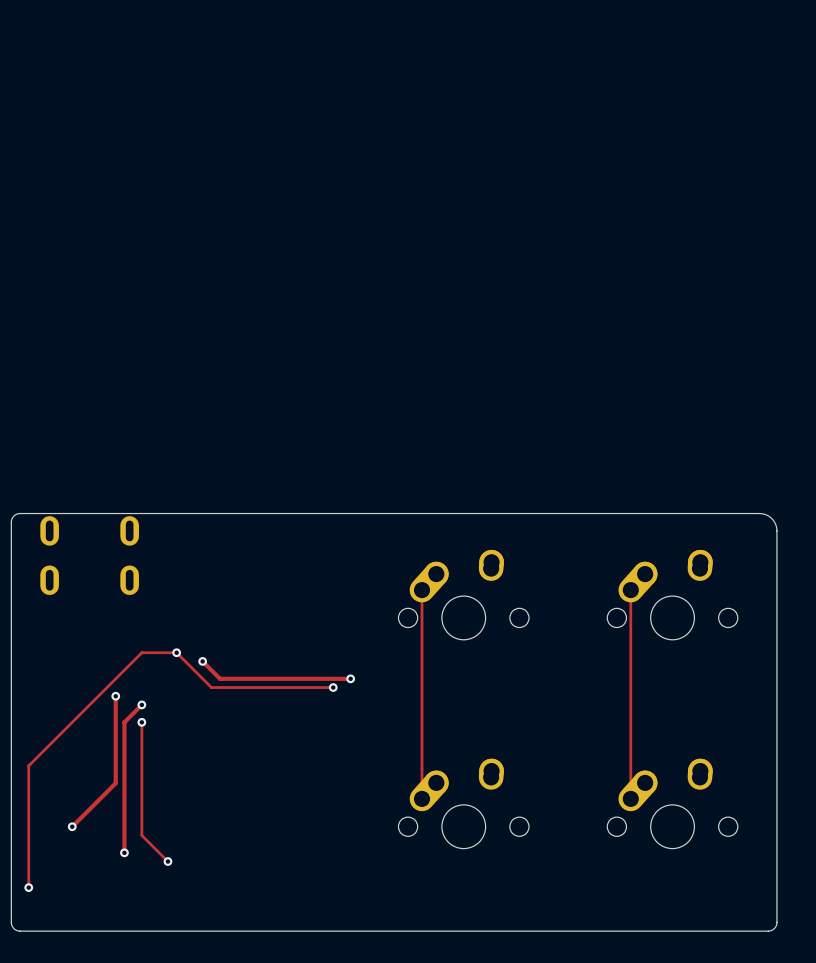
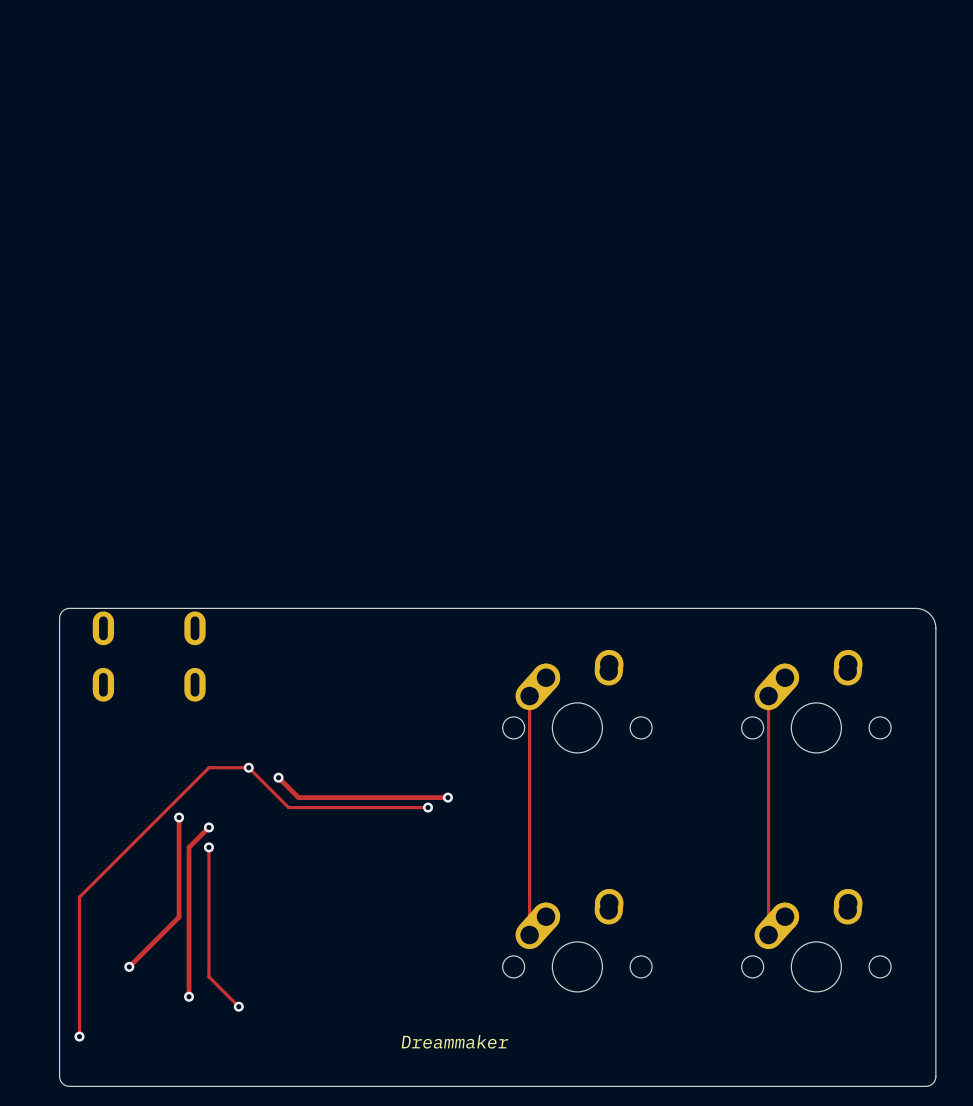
text: none -> Dreammaker (454, 1041)

